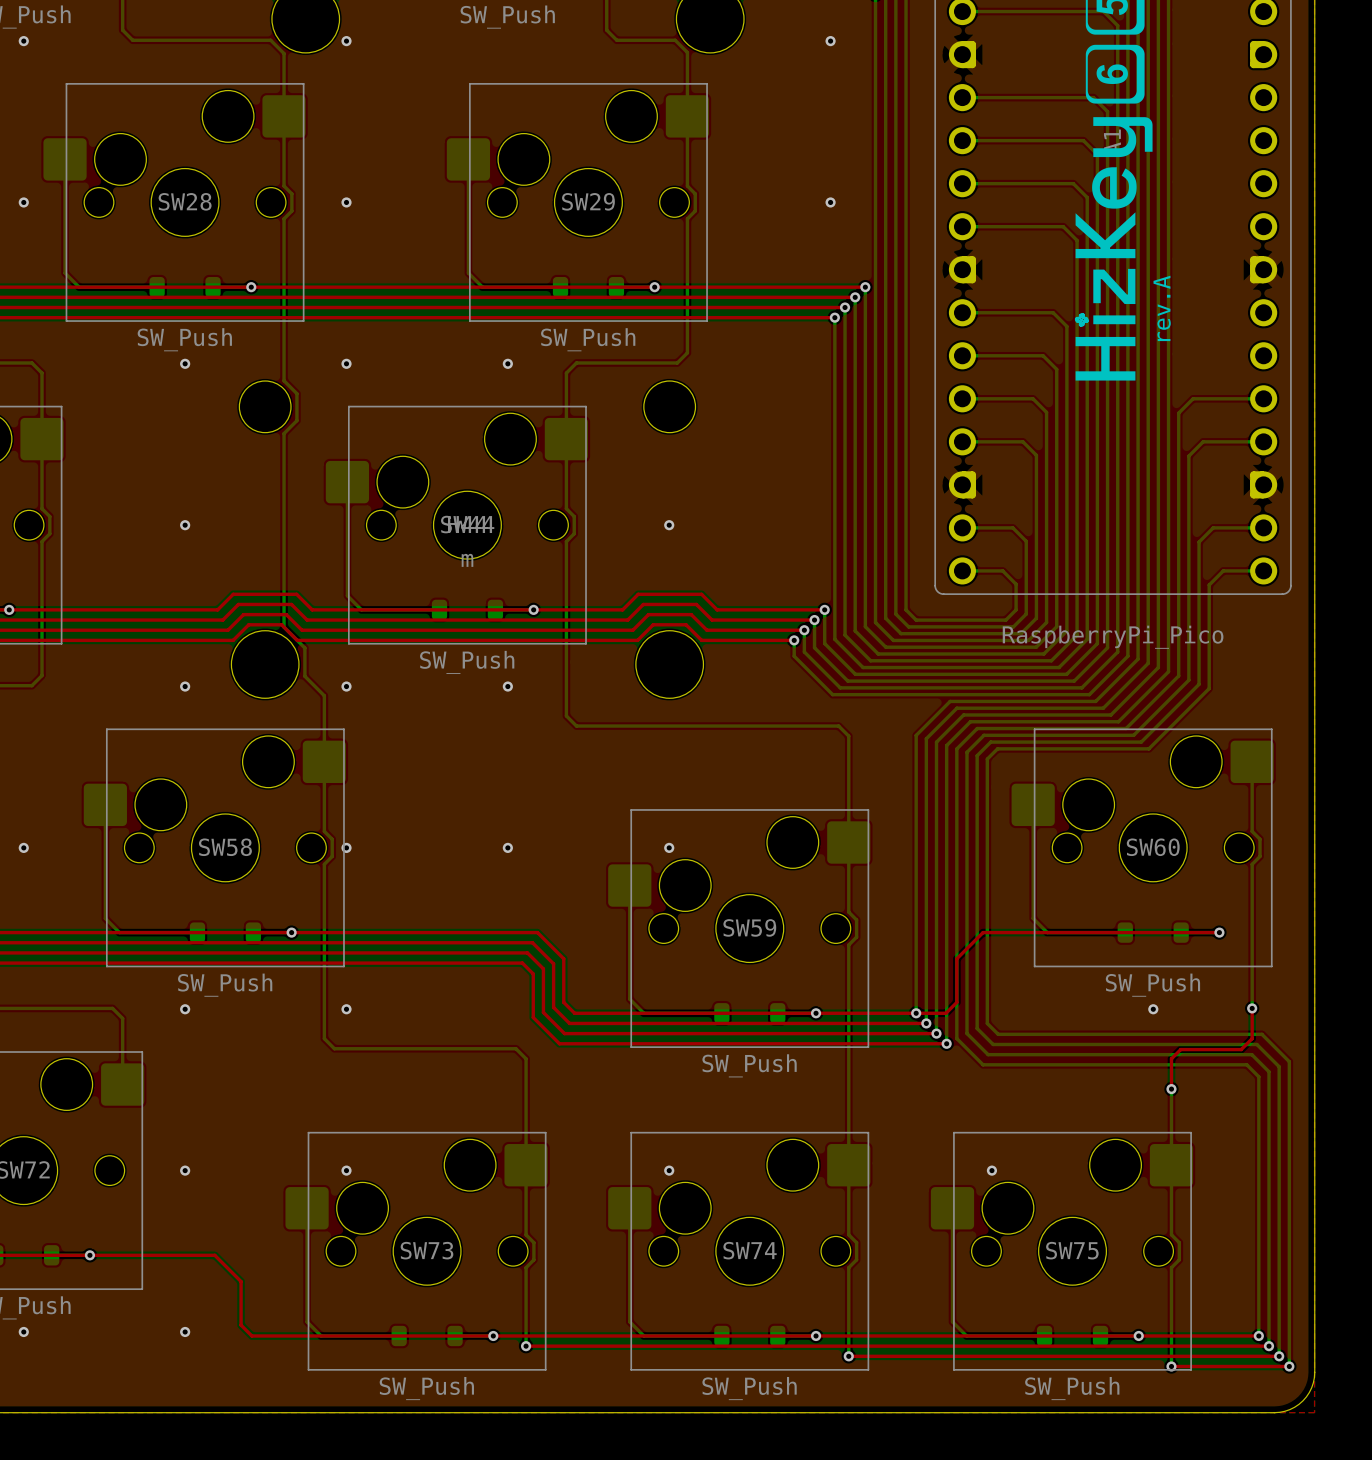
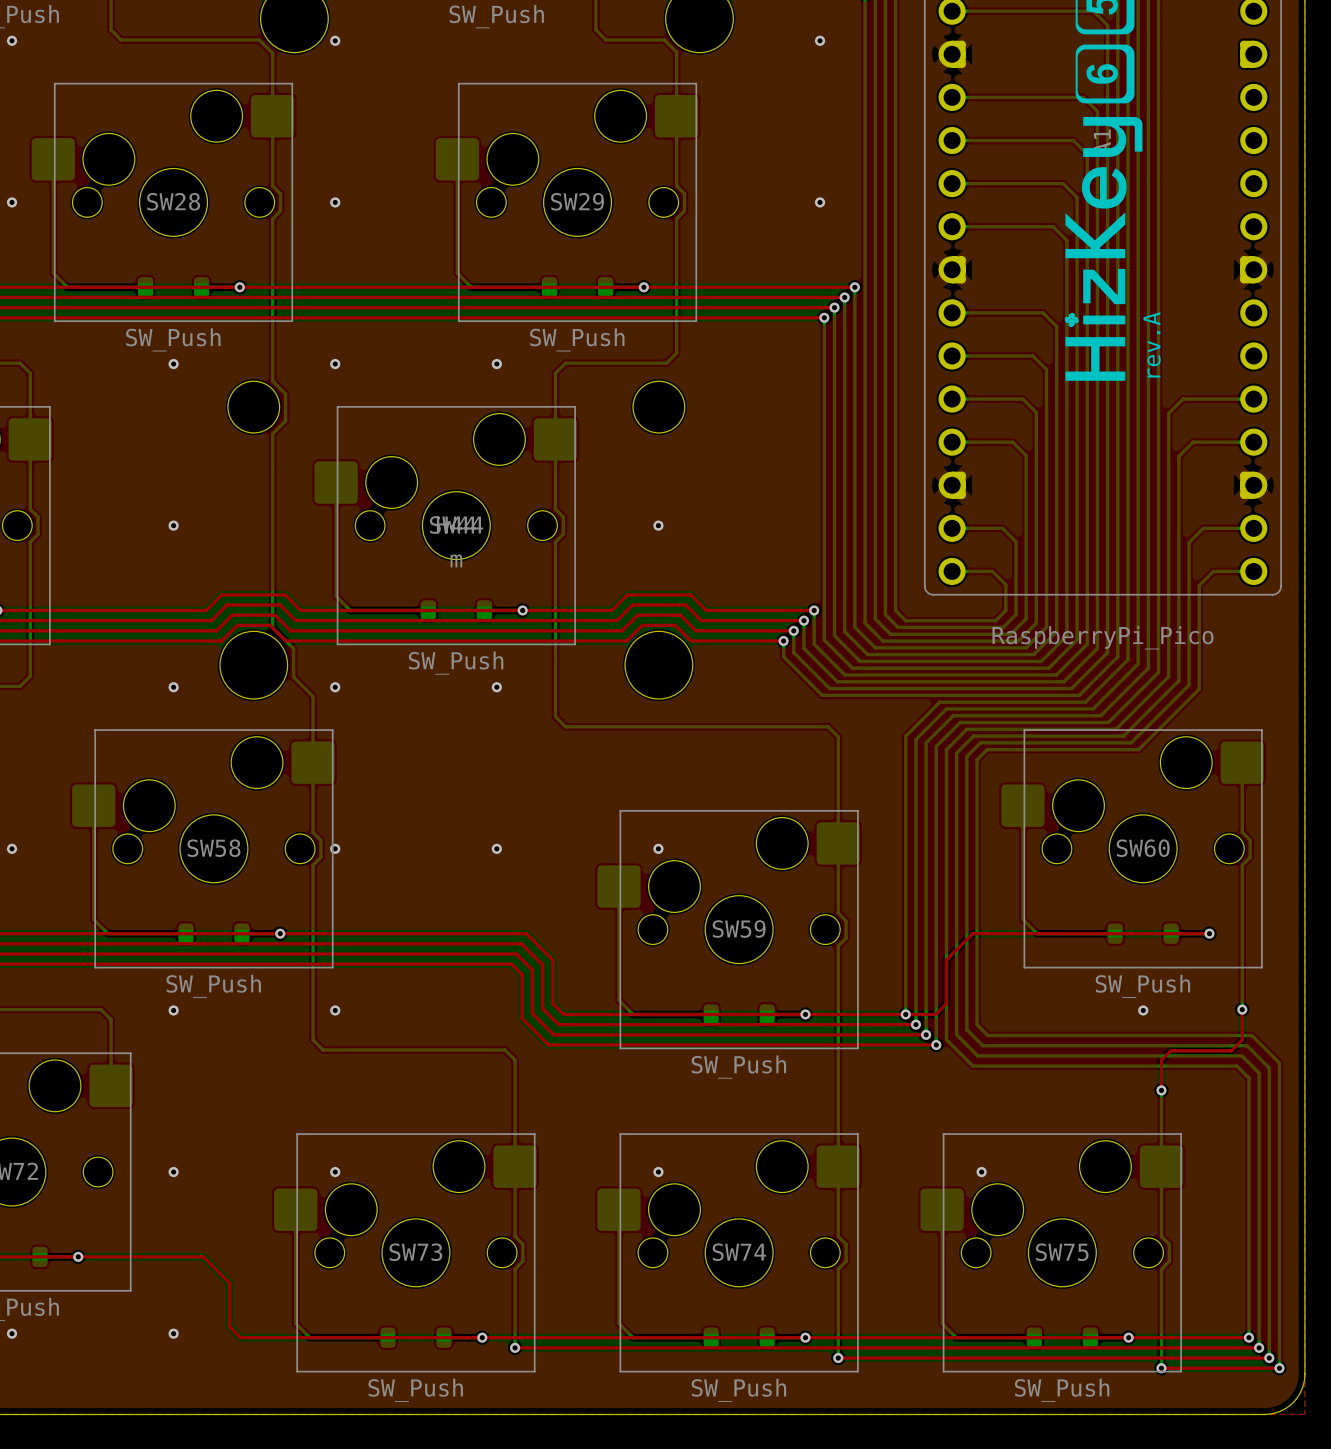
text position: A (1161, 282) -> A (1151, 318)
text position: rev. (1164, 317) -> rev. (1154, 354)

